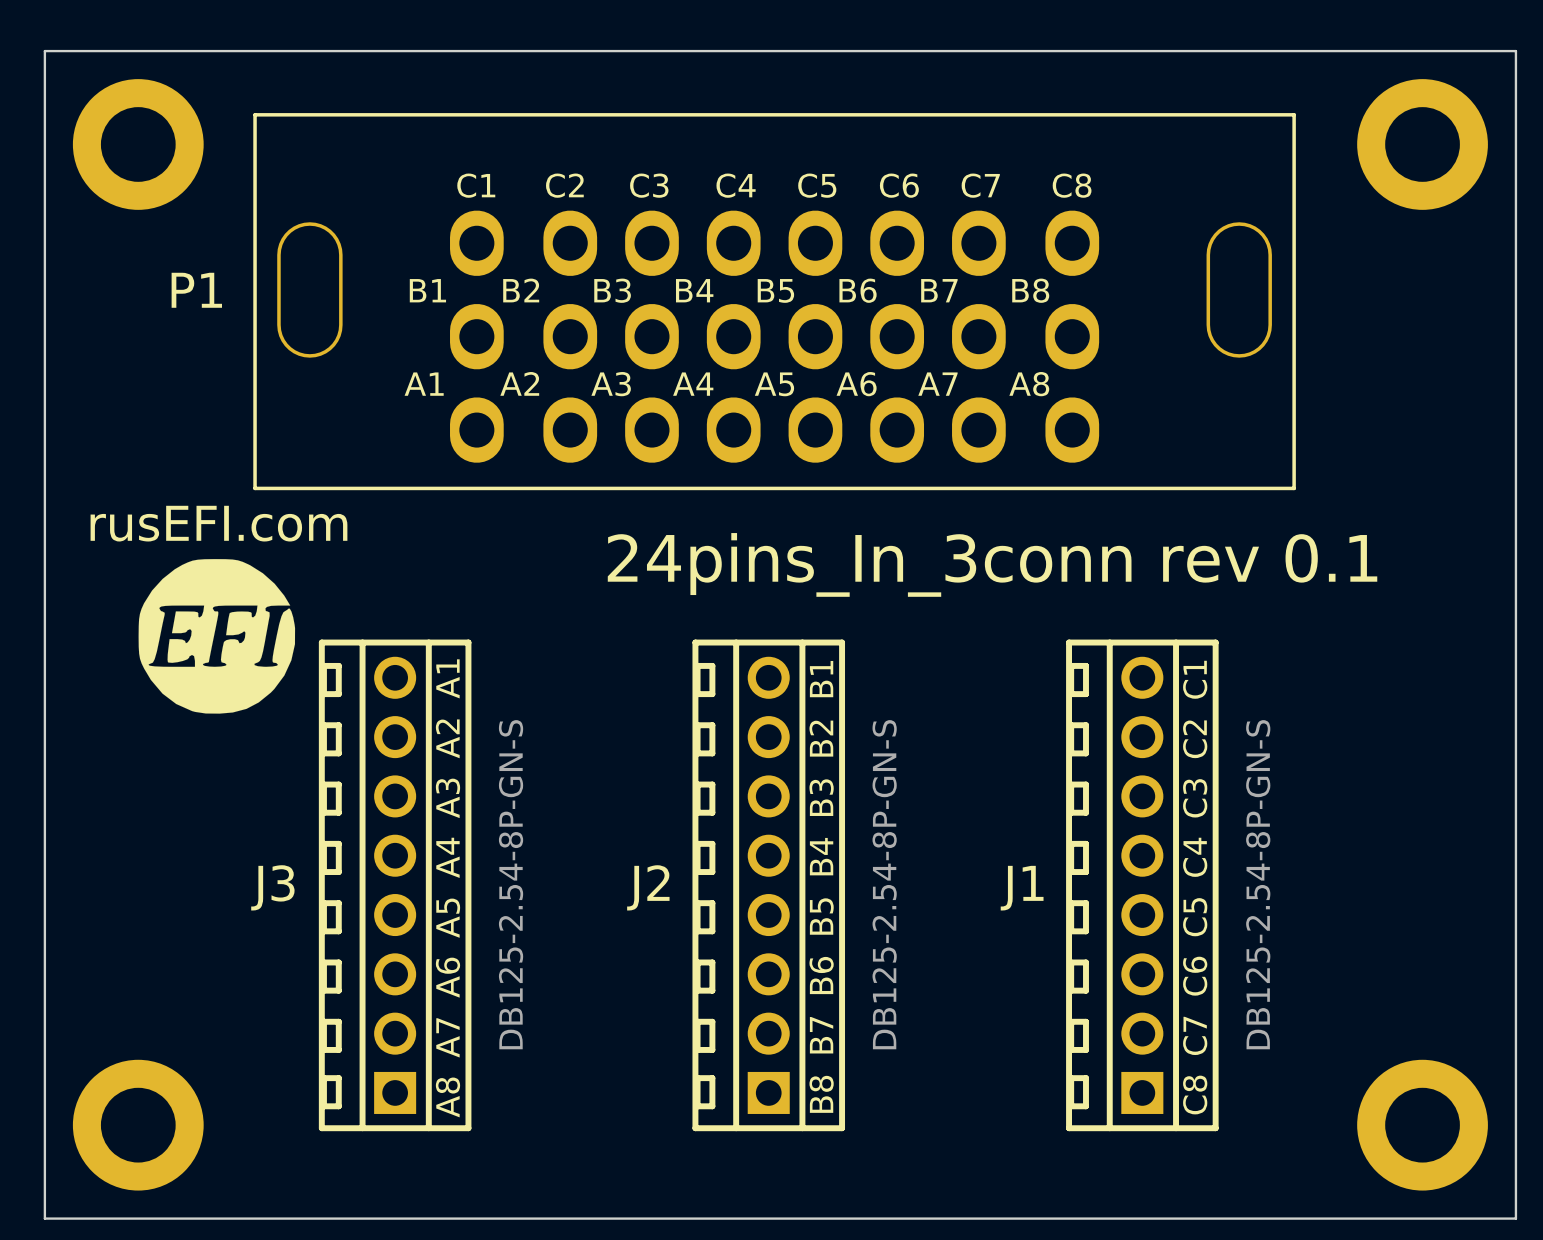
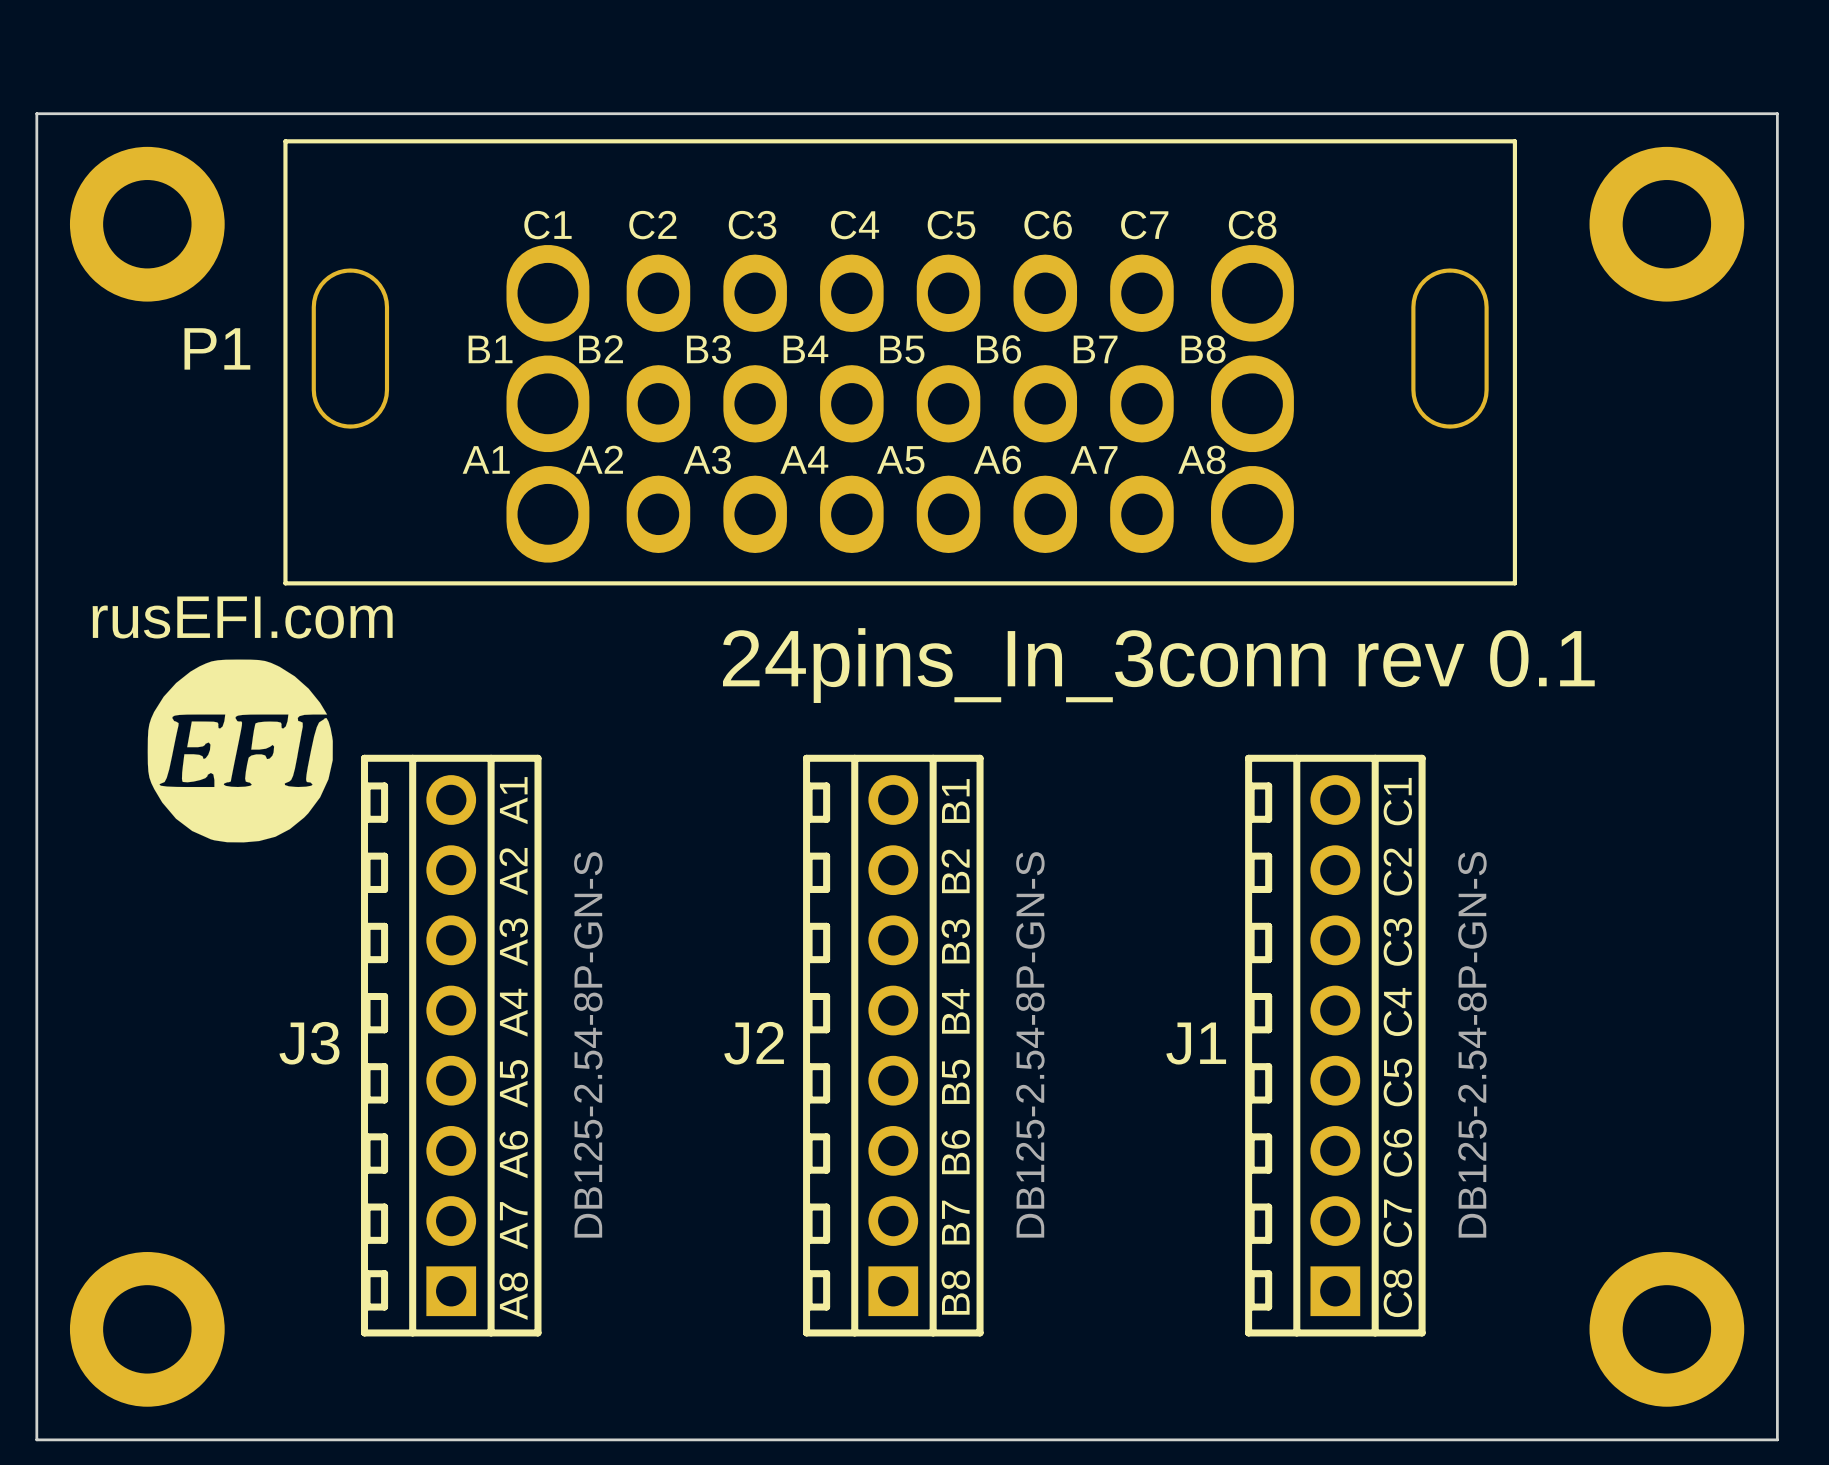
board edge: (44, 97) (44, 51) (1515, 51) (1515, 97) -> (36, 113) (1777, 113)
P1 footprint: [253, 113, 1296, 491] -> [283, 139, 1518, 586]
part position: (138, 144) -> (147, 224)
part position: (1422, 144) -> (1666, 224)

